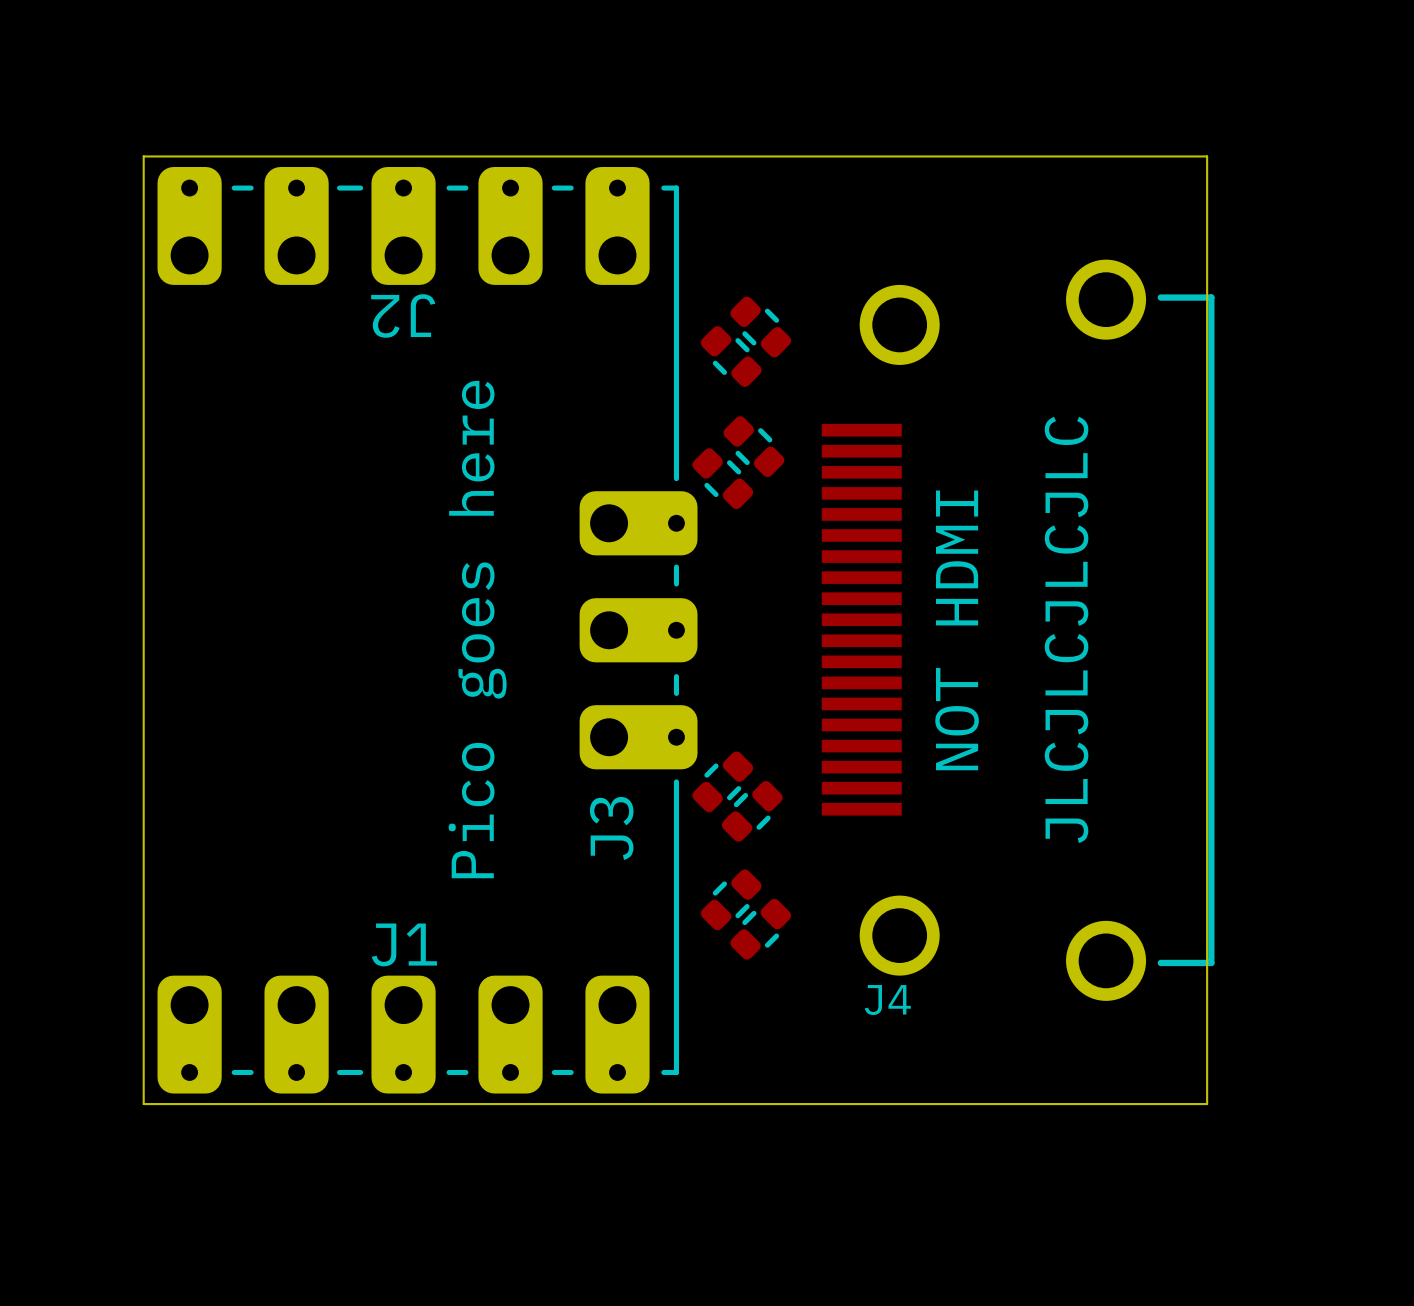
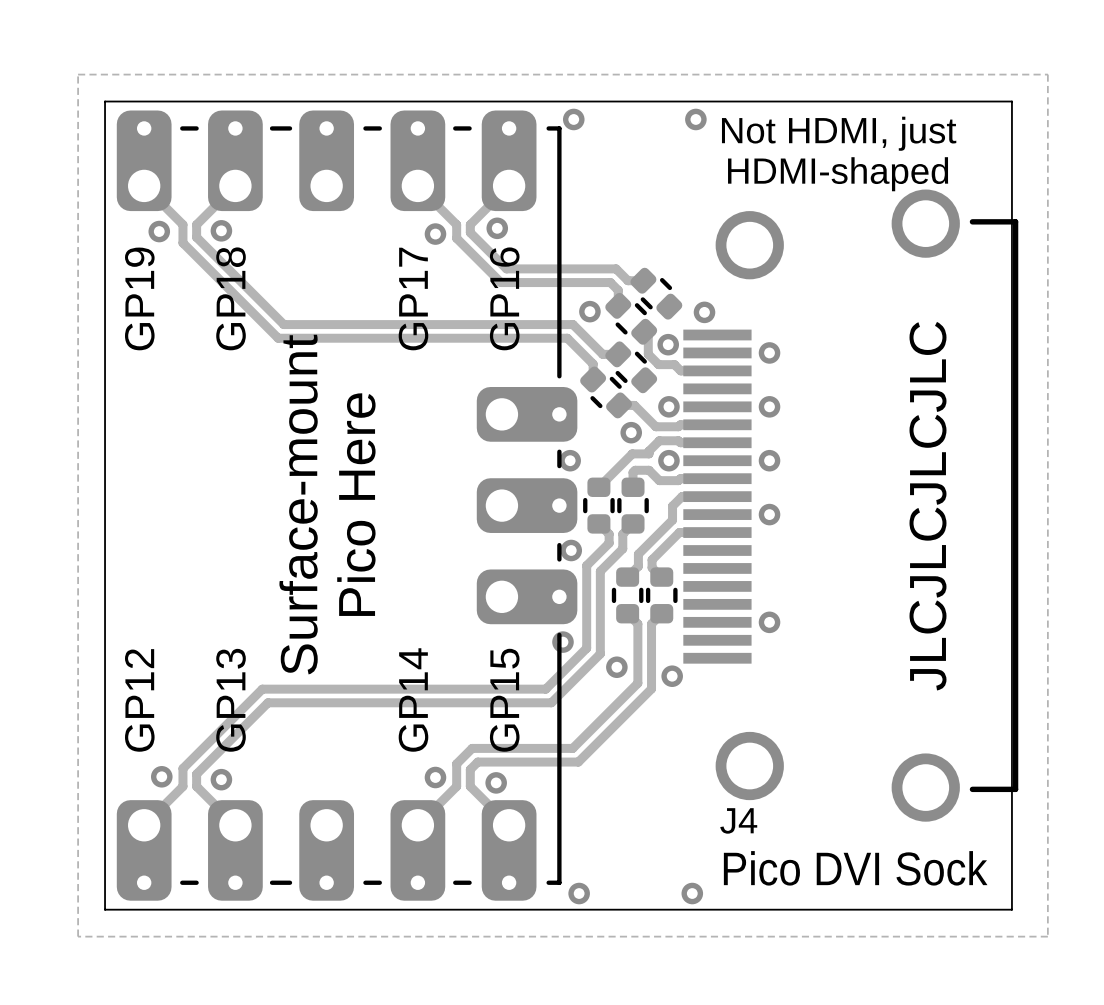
zone outline: none -> (78, 74) (78, 936) (1047, 936) (1047, 74) (78, 74)
via: none -> (573, 119)
via: none -> (695, 119)
text: none -> Not HDMI, just (839, 133)
text: none -> HDMI-shaped (838, 174)
track: none -> (144, 185) (182, 224) (182, 242) (278, 338) (567, 338) (593, 364) (593, 379)
track: none -> (235, 185) (196, 224) (196, 237) (283, 324) (572, 324) (602, 354) (618, 354)
track: none -> (417, 185) (456, 224) (456, 238) (500, 282) (610, 282) (618, 290) (618, 305)
track: none -> (509, 185) (470, 224) (470, 232) (506, 268) (616, 268) (627, 280) (643, 280)
via: none -> (497, 228)
via: none -> (159, 231)
via: none -> (221, 230)
via: none -> (435, 234)
J2 name: J2 (403, 315) -> none
part: (760, 327) -> none
part: (731, 356) -> none
part: none -> (656, 293)
text: none -> GP18 (231, 298)
text: none -> GP19 (139, 298)
text: none -> GP17 (413, 299)
text: none -> GP16 (504, 298)
via: none -> (589, 311)
via: none -> (704, 312)
part: none -> (631, 318)
track: none -> (644, 331) (651, 331) (648, 335) (648, 354) (658, 364) (674, 364) (680, 370) (717, 370)
via: none -> (668, 344)
part: (753, 446) -> none
via: none -> (769, 352)
part: none -> (631, 367)
part: (722, 478) -> none
part: none -> (606, 392)
track: none -> (619, 405) (634, 405) (655, 426) (717, 424)
via: none -> (668, 406)
via: none -> (769, 406)
via: none -> (631, 432)
track: none -> (717, 442) (659, 440) (649, 451) (649, 453) (632, 453) (598, 487)
via: none -> (570, 460)
via: none -> (668, 460)
via: none -> (769, 460)
track: none -> (717, 478) (659, 480) (649, 470) (635, 470) (633, 472) (633, 487)
track: none -> (717, 496) (682, 496) (672, 506) (672, 520) (638, 554) (638, 566) (627, 577)
text: Pico goes here (477, 629) -> Pico Here (356, 504)
text position: JLCJLCJLCJLC (1066, 629) -> JLCJLCJLCJLC (928, 506)
part: none -> (598, 505)
part: none -> (633, 505)
text: NOT HDMI (957, 630) -> none
text: none -> Surface-mount (298, 504)
via: none -> (769, 514)
track: none -> (598, 523) (609, 534) (609, 543) (586, 565) (586, 648) (545, 689) (262, 689) (182, 768) (182, 786) (144, 825)
track: none -> (633, 523) (622, 534) (622, 548) (600, 571) (600, 653) (551, 702) (268, 702) (196, 774) (196, 786) (235, 825)
track: none -> (717, 532) (679, 532) (652, 559) (652, 567) (661, 577)
via: none -> (571, 550)
part: none -> (627, 595)
part: none -> (661, 595)
track: none -> (627, 613) (637, 623) (637, 683) (572, 748) (472, 748) (456, 763) (456, 786) (417, 825)
track: none -> (661, 613) (651, 623) (651, 688) (578, 762) (477, 762) (470, 769) (470, 786) (509, 825)
via: none -> (769, 622)
part: (722, 781) -> none
via: none -> (562, 642)
part: (752, 811) -> none
via: none -> (616, 667)
J3 name: J3 (611, 828) -> none
via: none -> (672, 676)
text: none -> GP12 (139, 700)
text: none -> GP14 (413, 699)
text: none -> GP15 (504, 700)
text: none -> GP13 (231, 700)
part: (731, 899) -> none
part: (760, 929) -> none
J1 name: J1 (404, 944) -> none
via: none -> (161, 776)
via: none -> (435, 777)
via: none -> (221, 779)
via: none -> (496, 782)
text: none -> Pico DVI Sock (855, 868)
via: none -> (579, 893)
via: none -> (692, 893)

